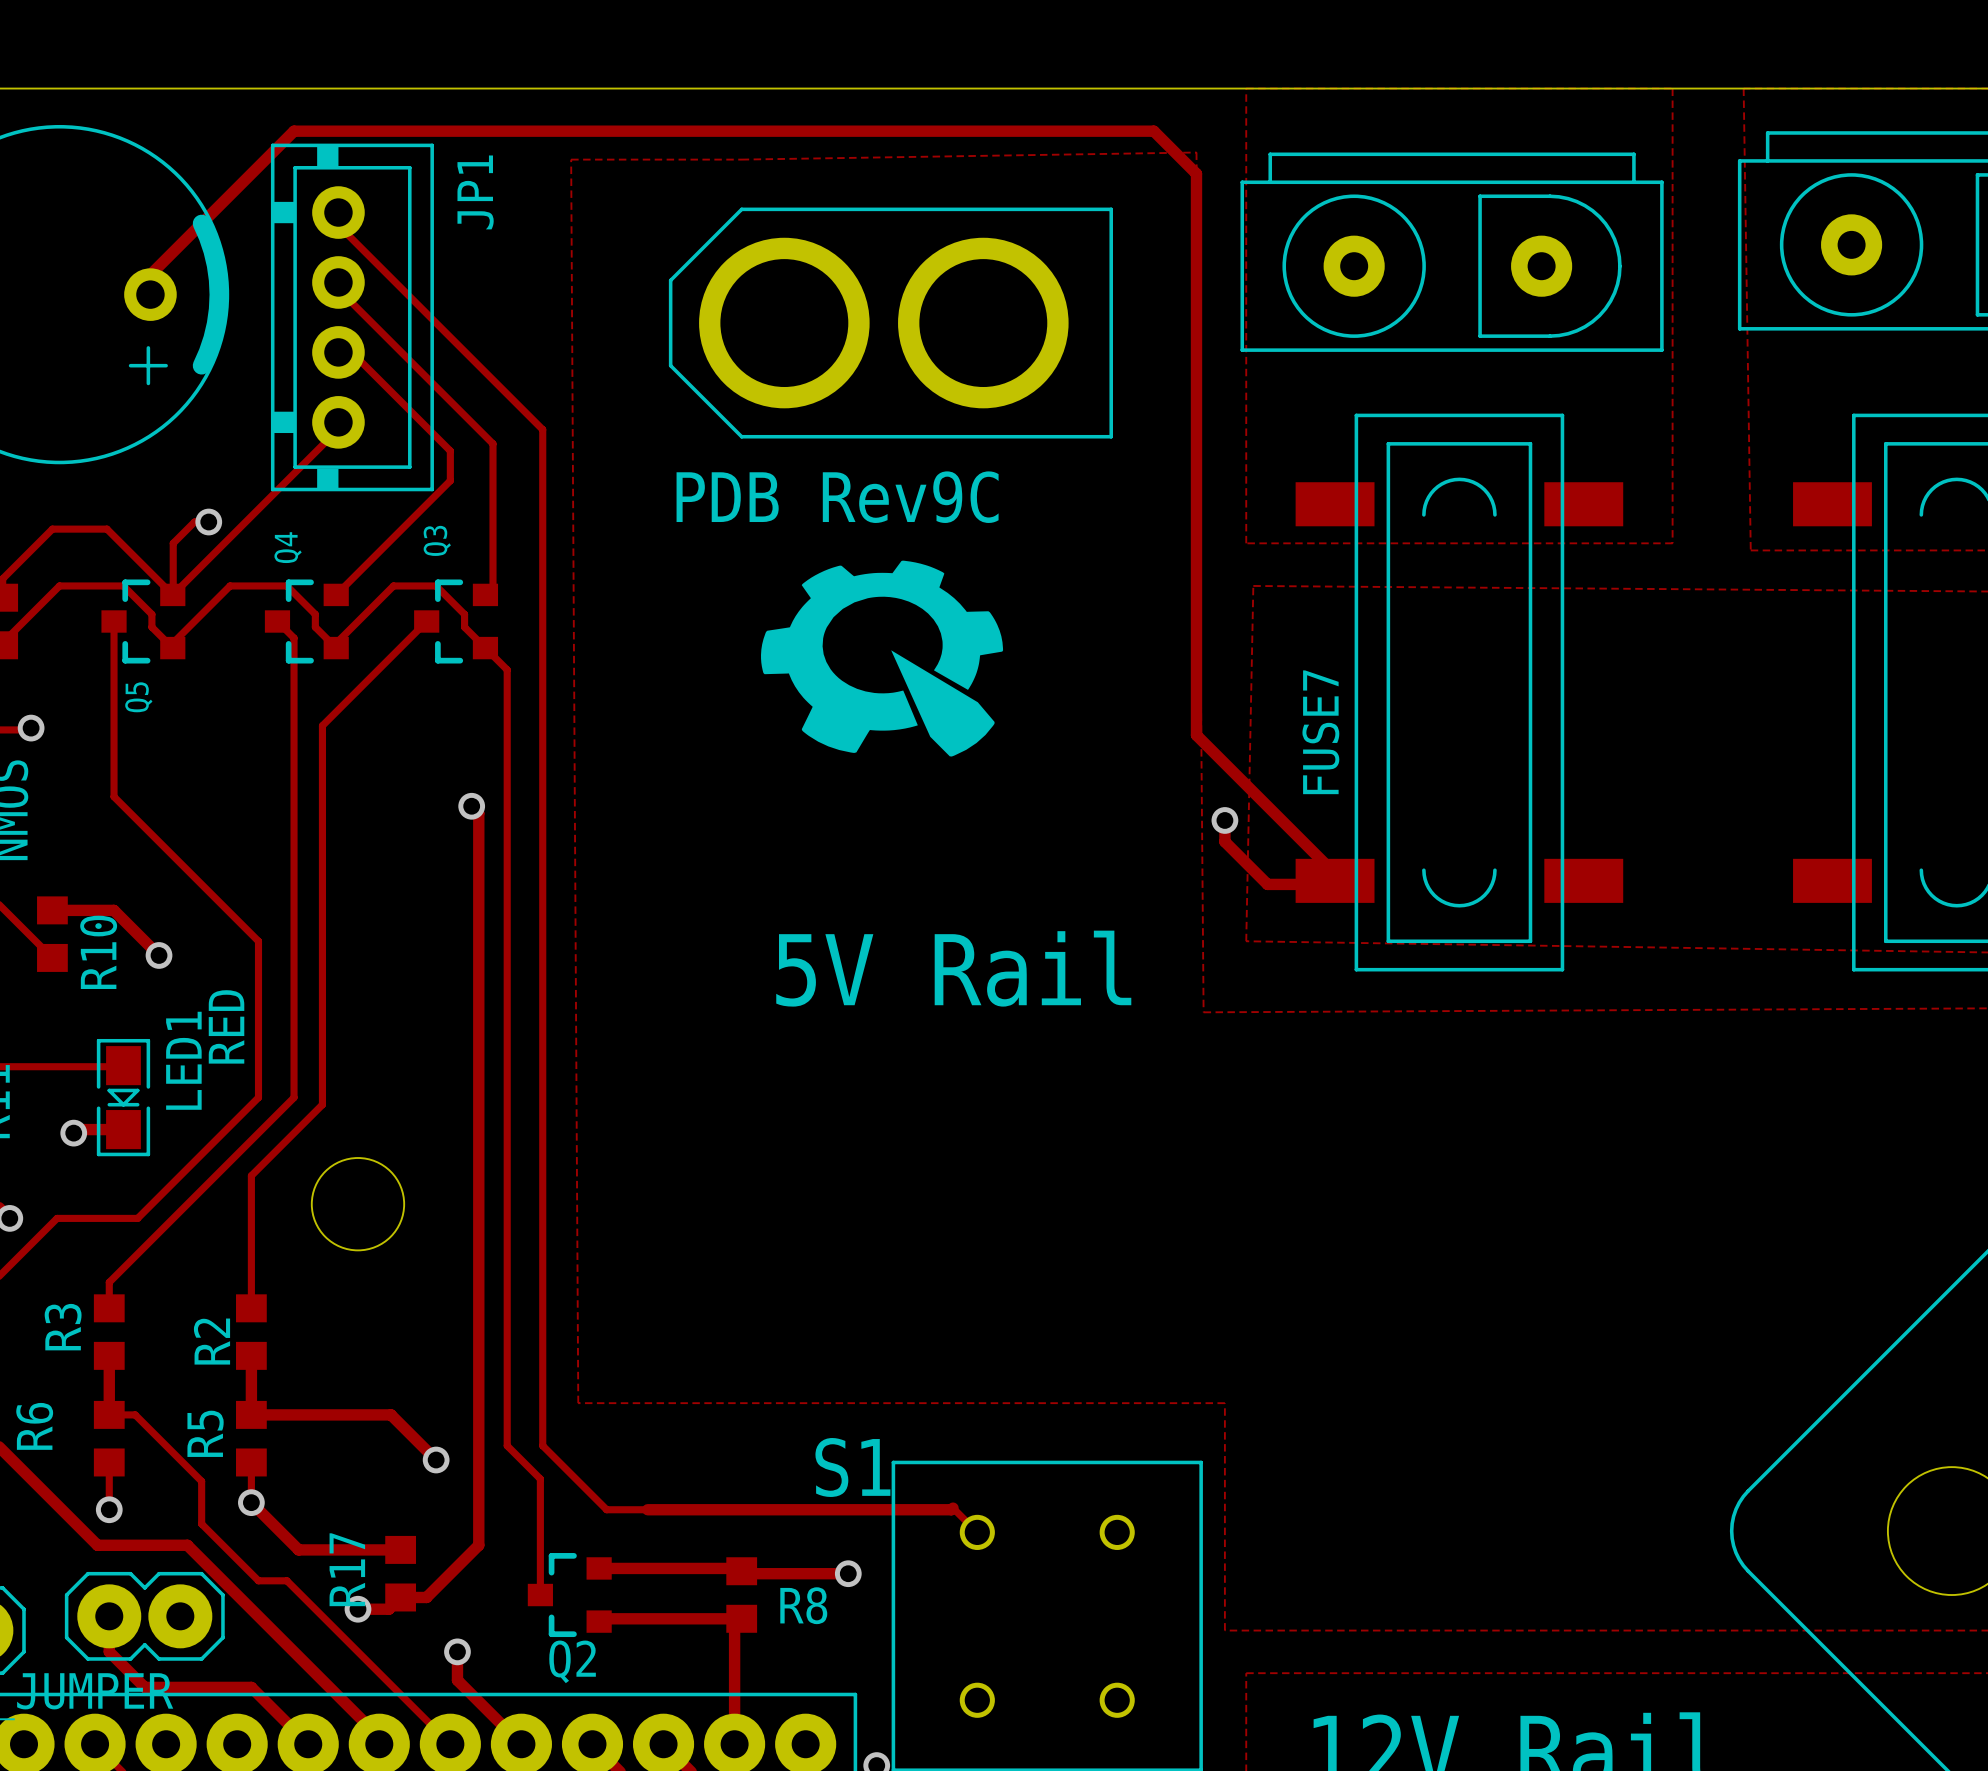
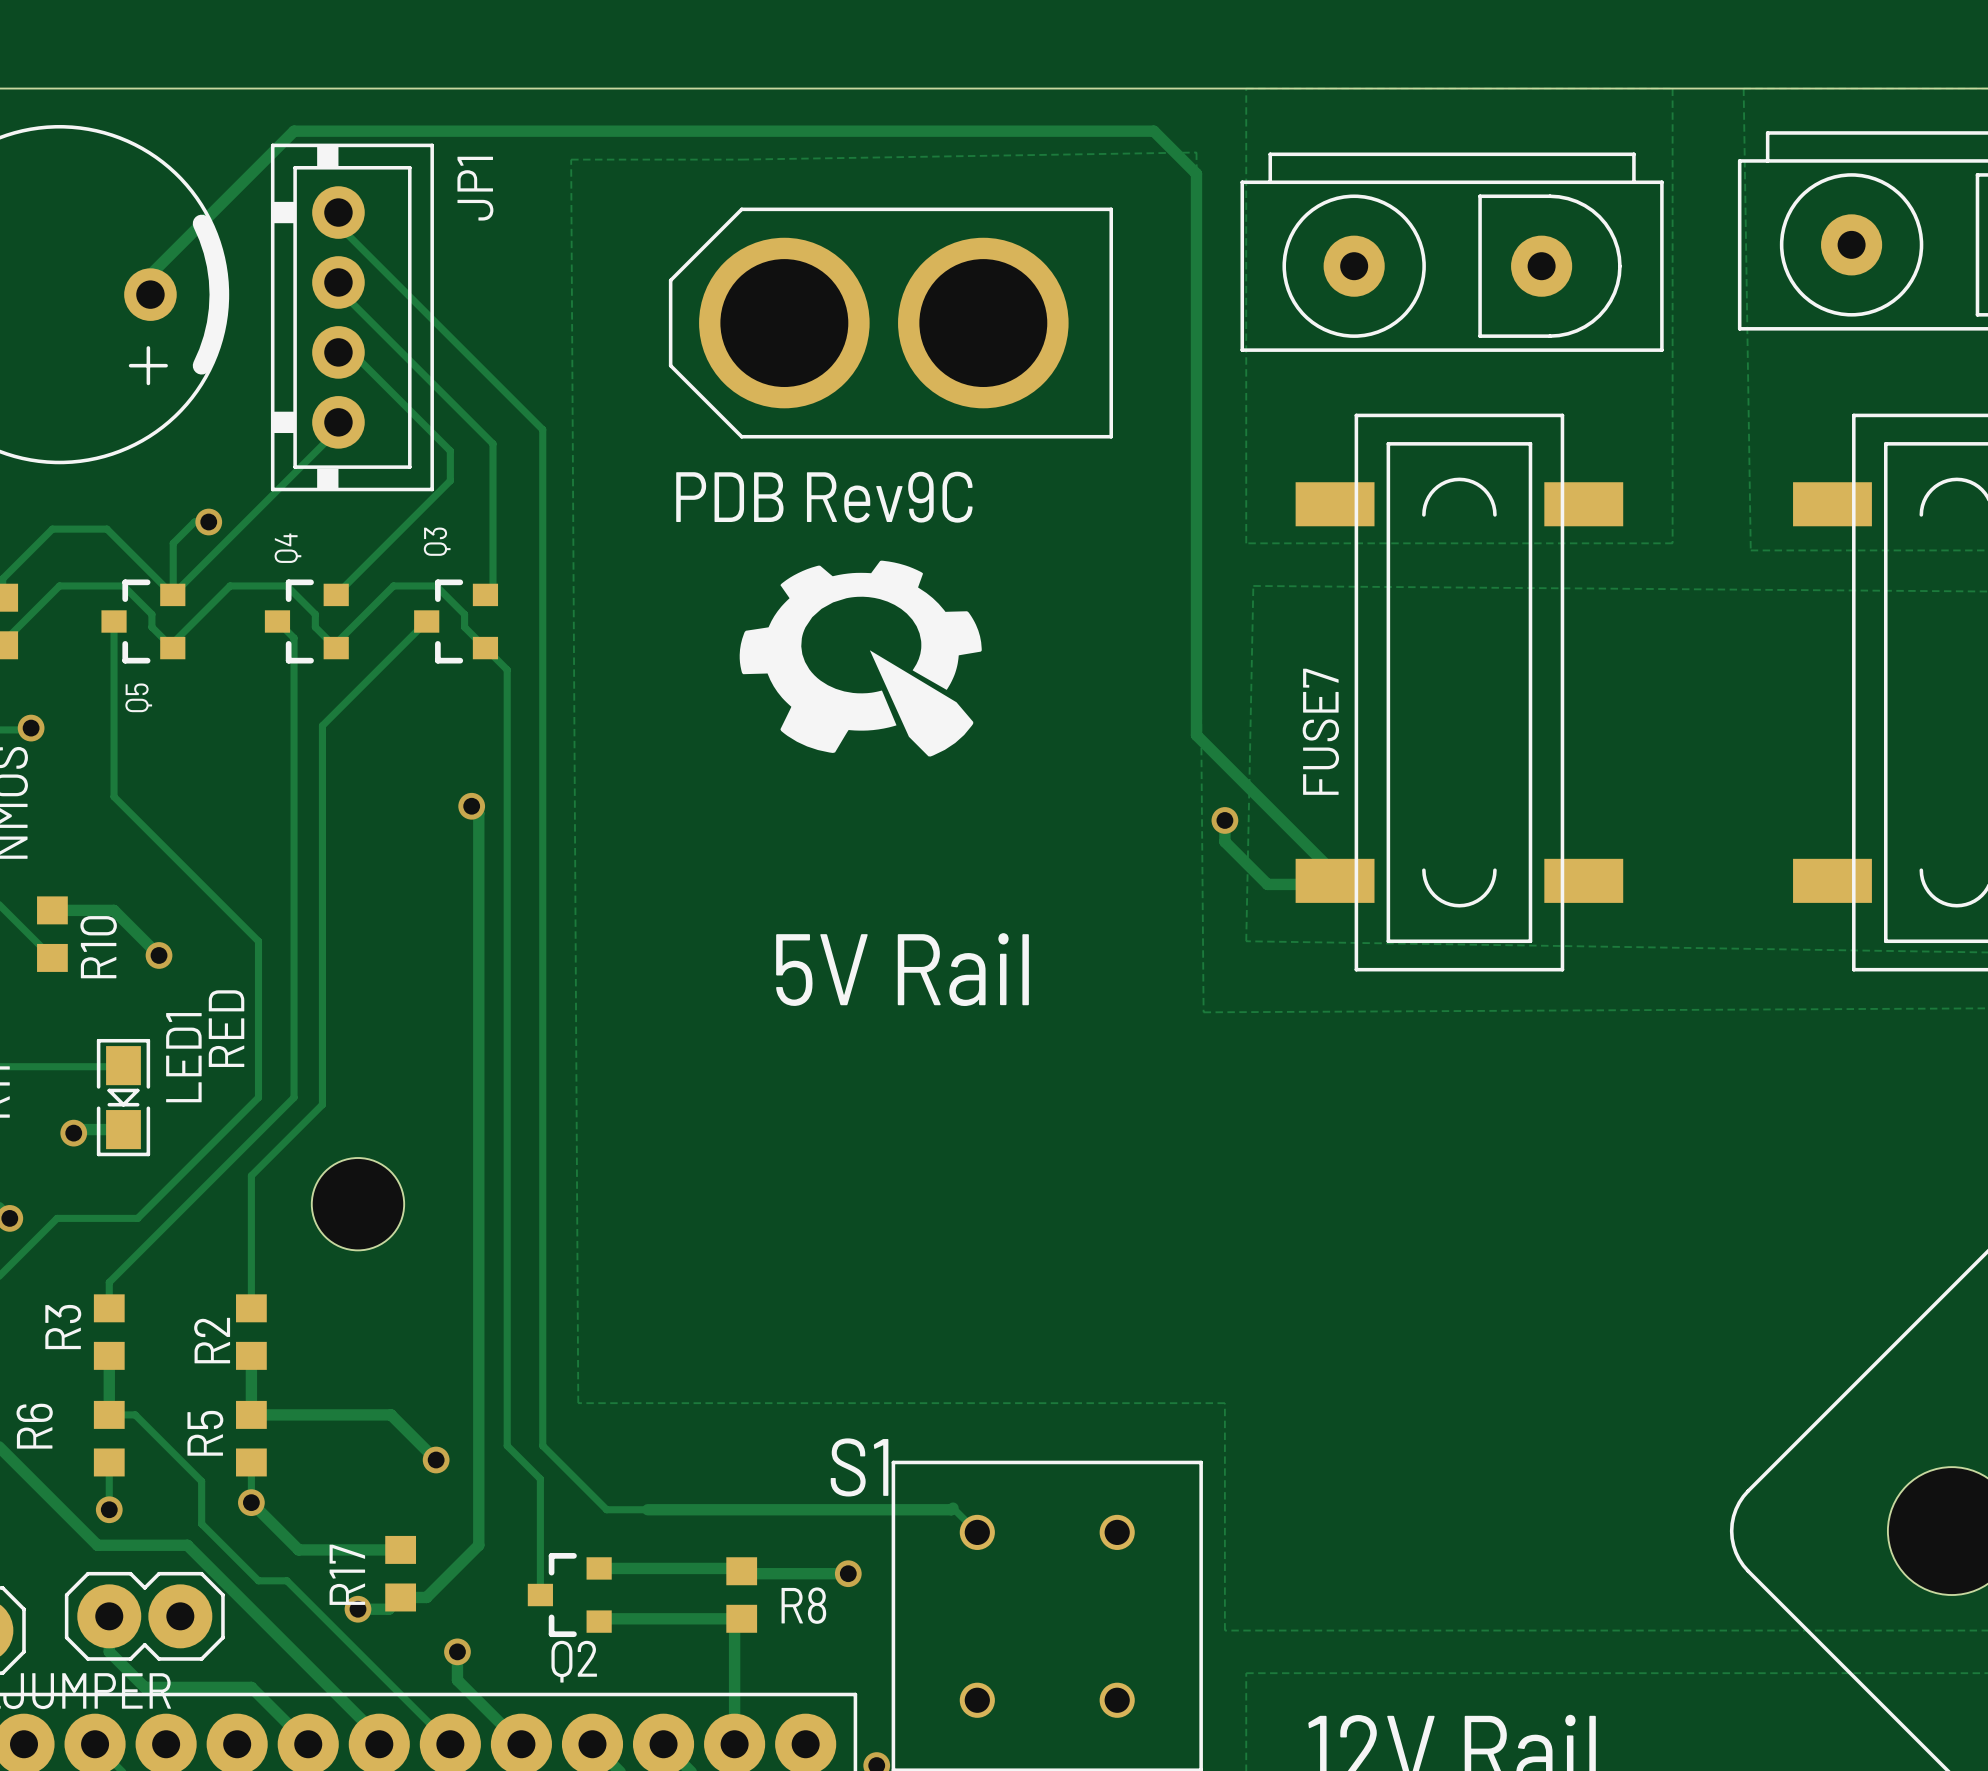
drawing position: (882, 658) -> (860, 658)

